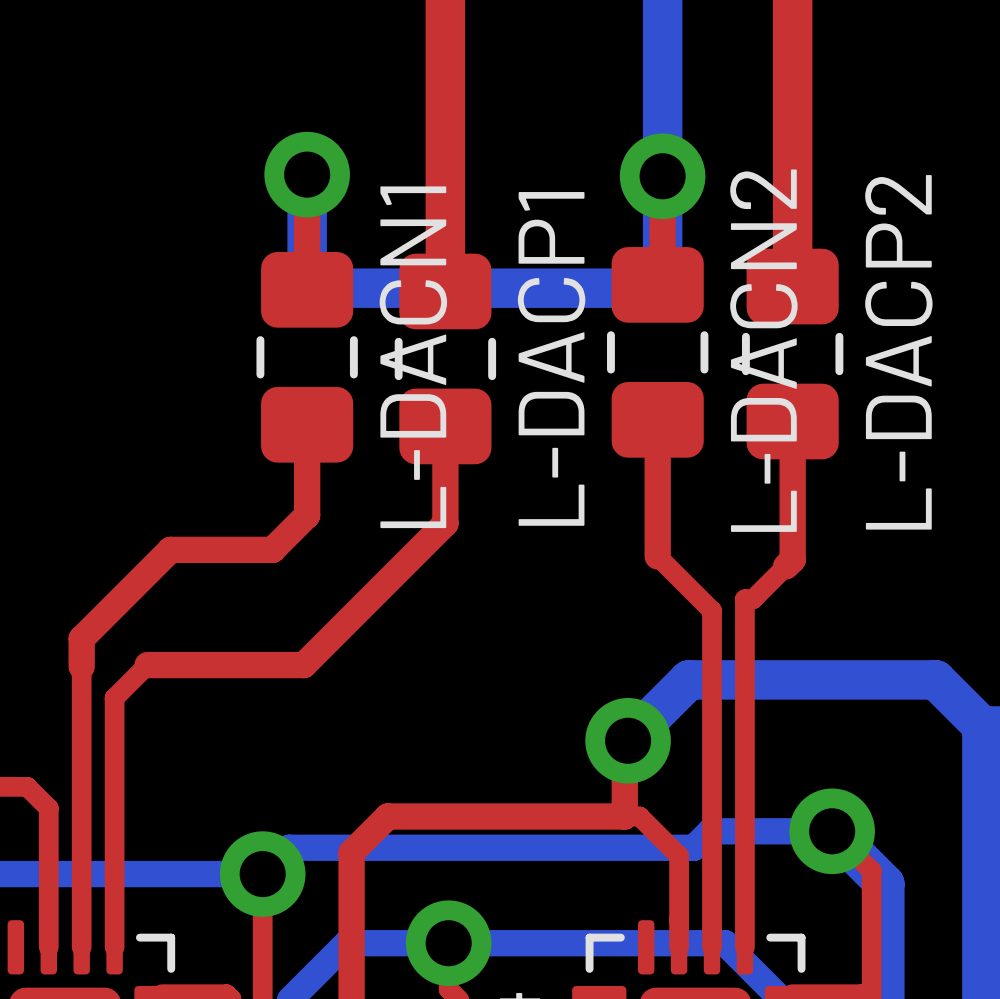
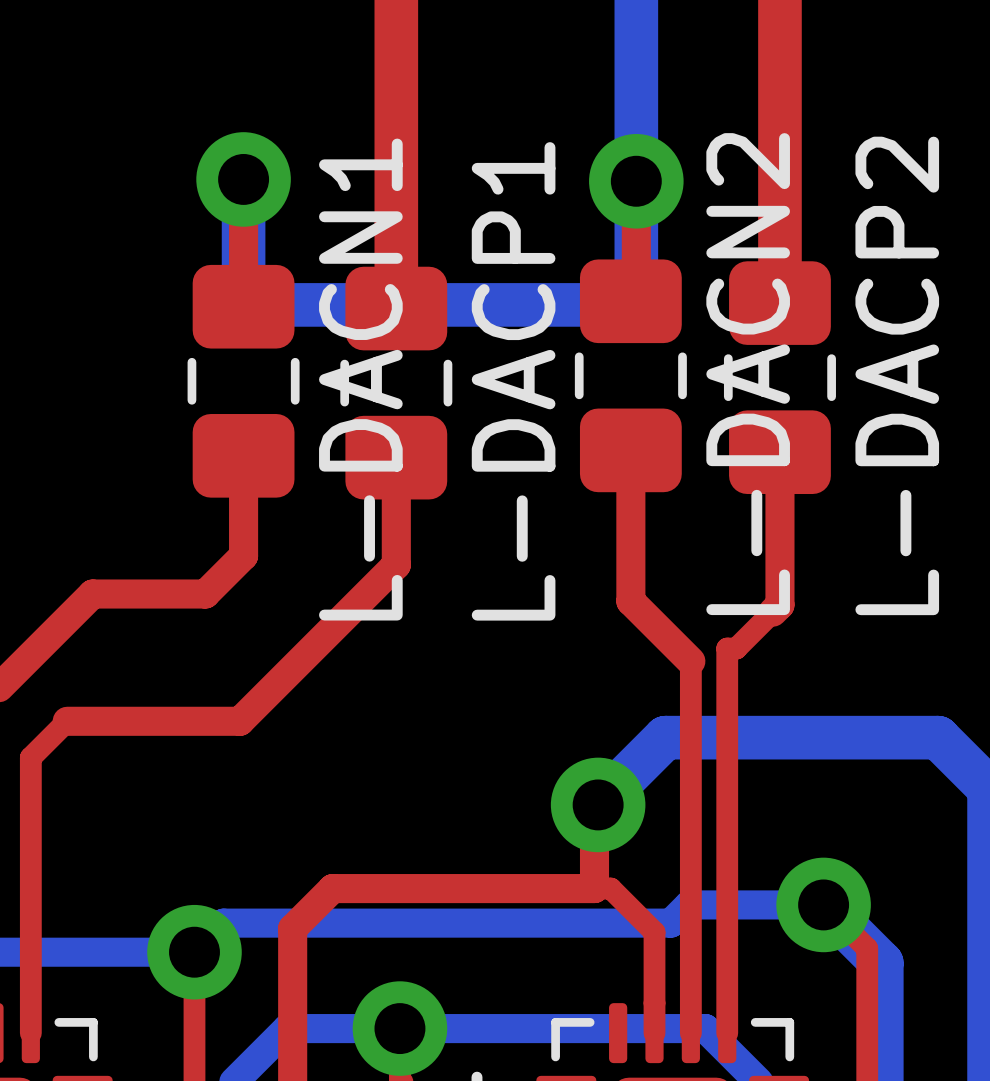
top track width: thin (657, 556) (712, 610) -> thick (630, 601) (690, 661)

